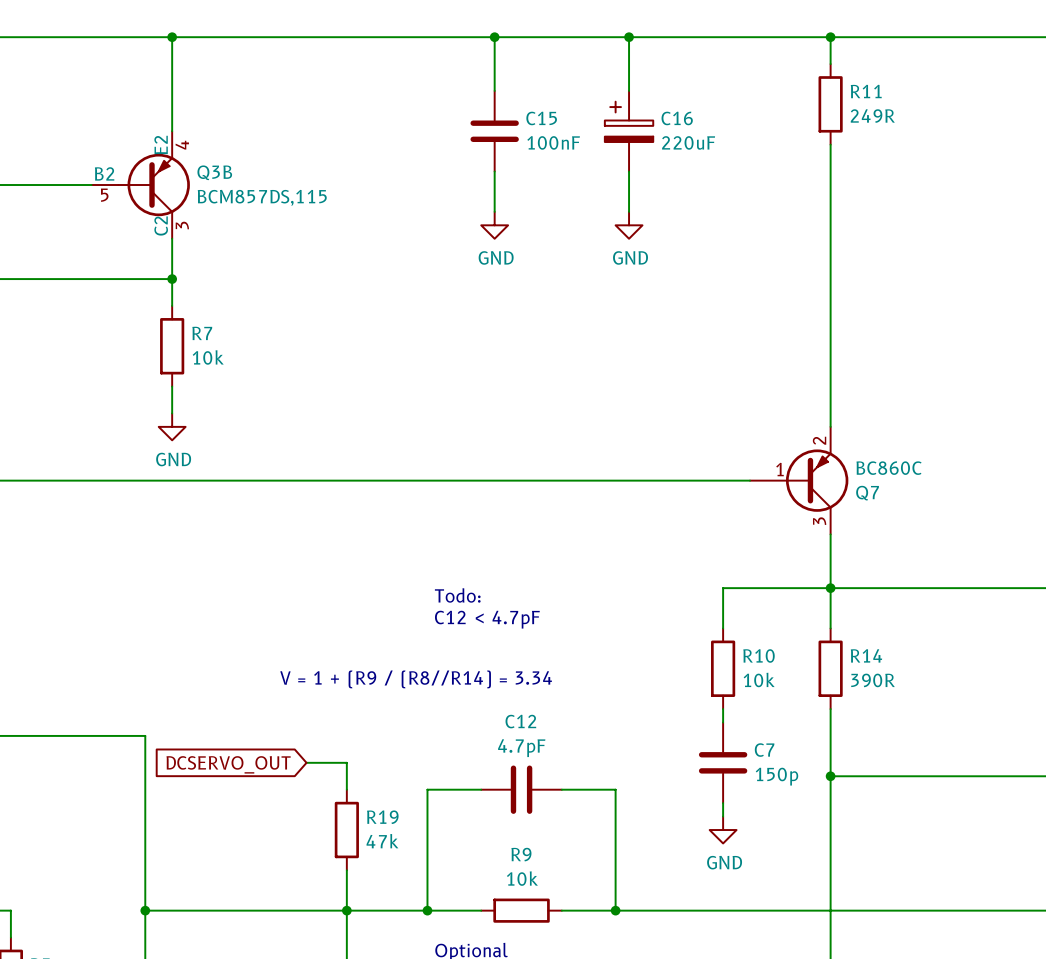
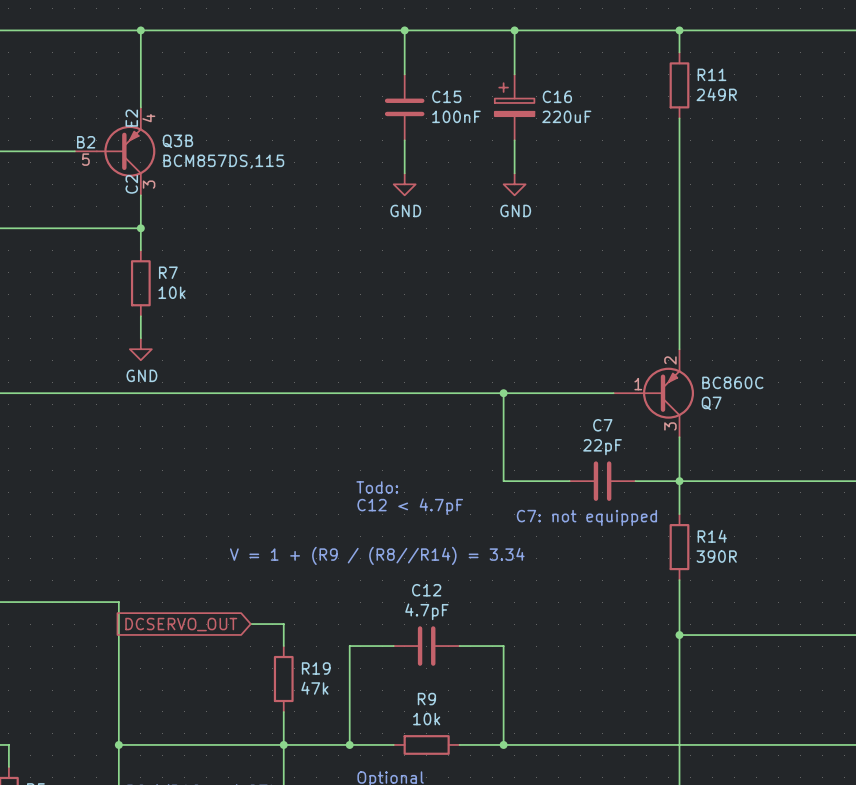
wire: none -> (503, 393) (503, 481) (569, 481)
junction: none -> (503, 393)
wire: (776, 588) (723, 588) (723, 628) -> none
text: none -> C7: not equipped (586, 517)
R10: 10k (723, 668) -> none
wire: (723, 709) (723, 722) -> none
C7 name position: C7 (764, 750) -> C7 (602, 425)
C7 rotation: 0° (723, 762) -> 90° clockwise (602, 481)
C7 position: (723, 762) -> (602, 481)
C7 value: 150p (776, 776) -> 22pF (602, 447)
wire: (723, 803) (723, 816) -> none
power symbol: GND (723, 830) -> none

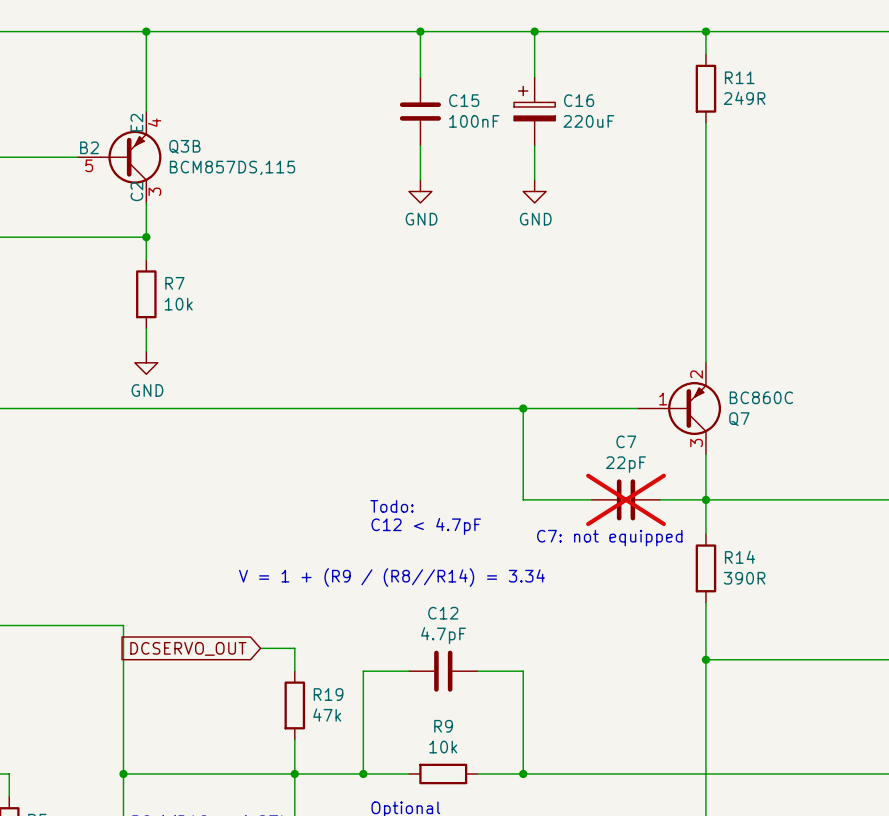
C7 do-not-place cross: none -> (626, 499)

